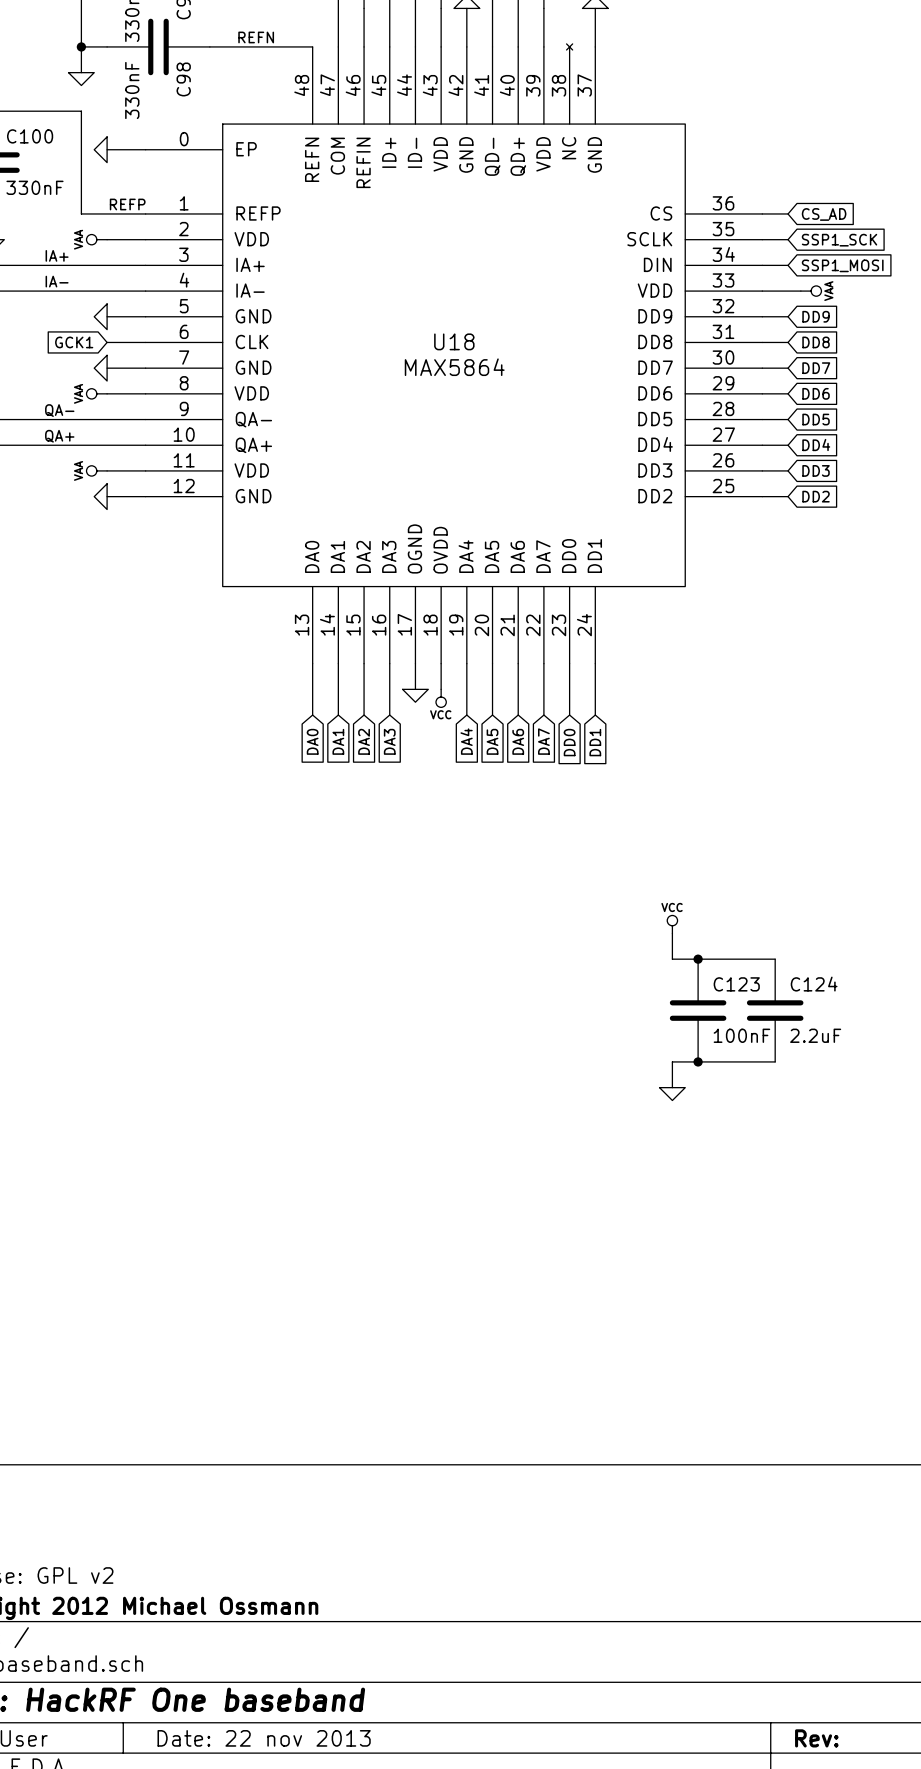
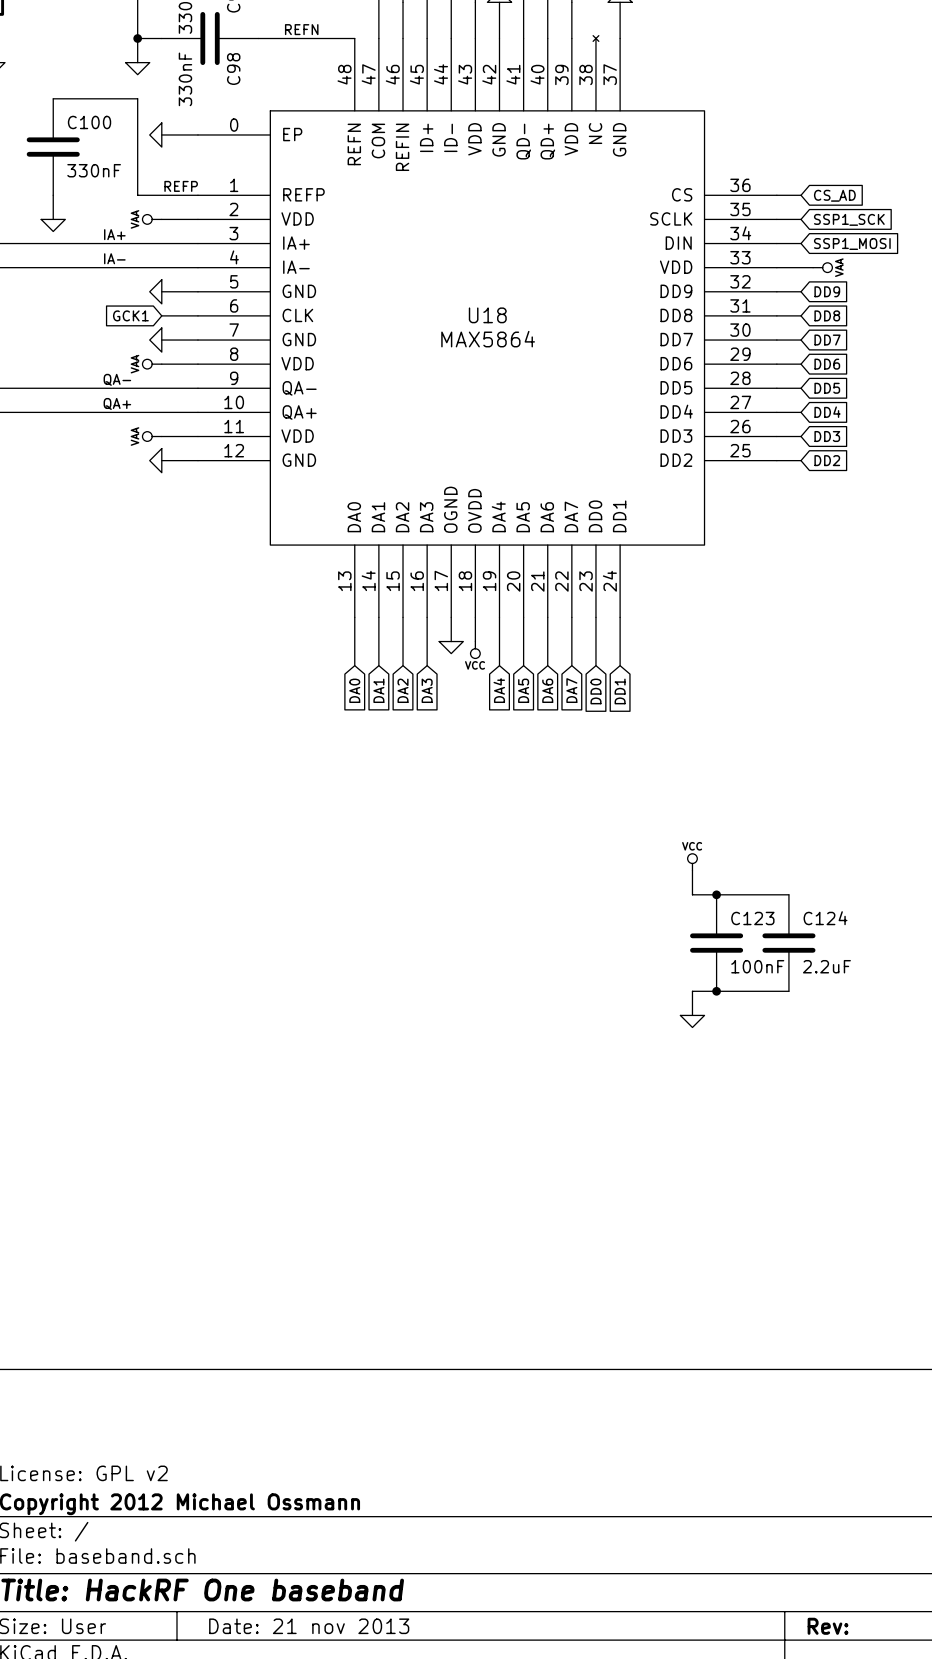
title block: Date: 22 nov 2013 (264, 1738) -> Date: 21 nov 2013 (309, 1626)

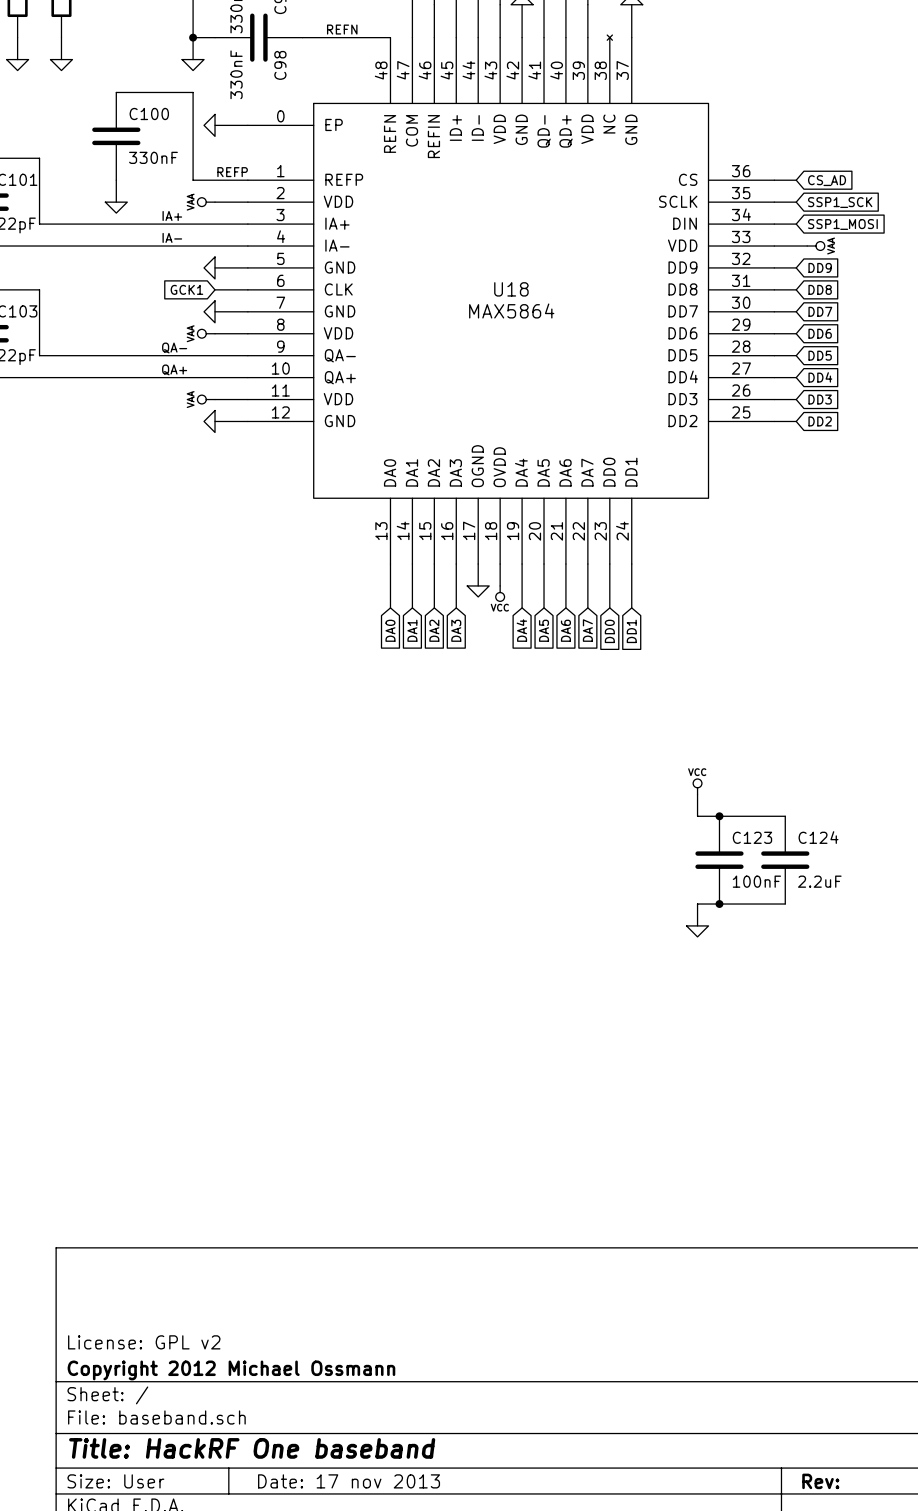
title block: Date: 21 nov 2013 (309, 1626) -> Date: 17 nov 2013 (349, 1481)

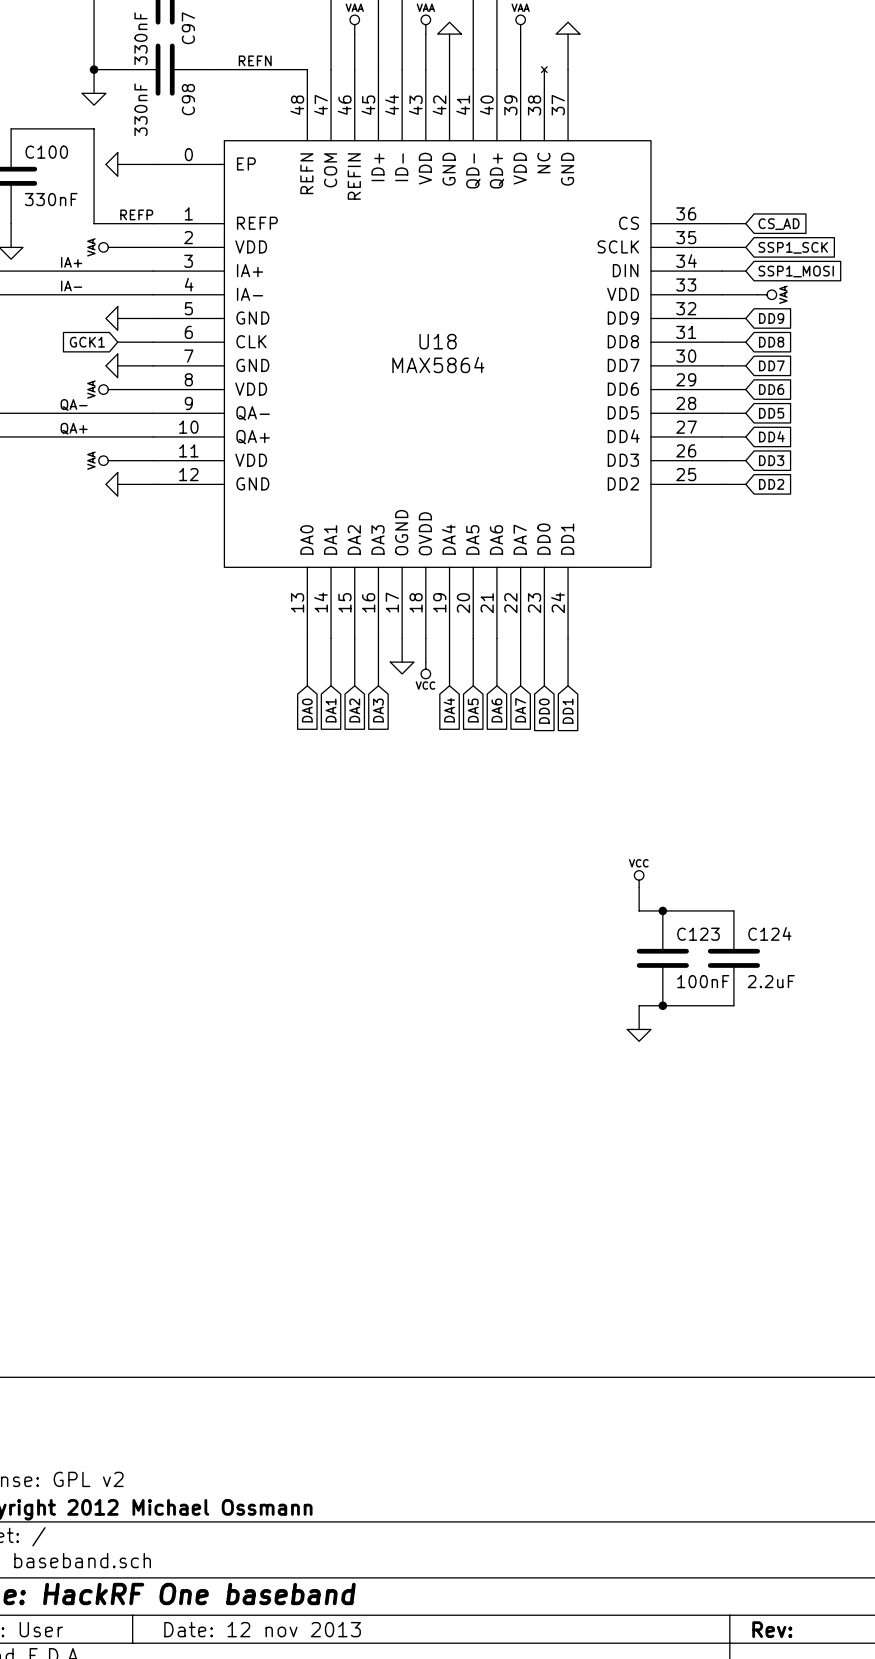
title block: Date: 17 nov 2013 (349, 1481) -> Date: 12 nov 2013 (262, 1629)

